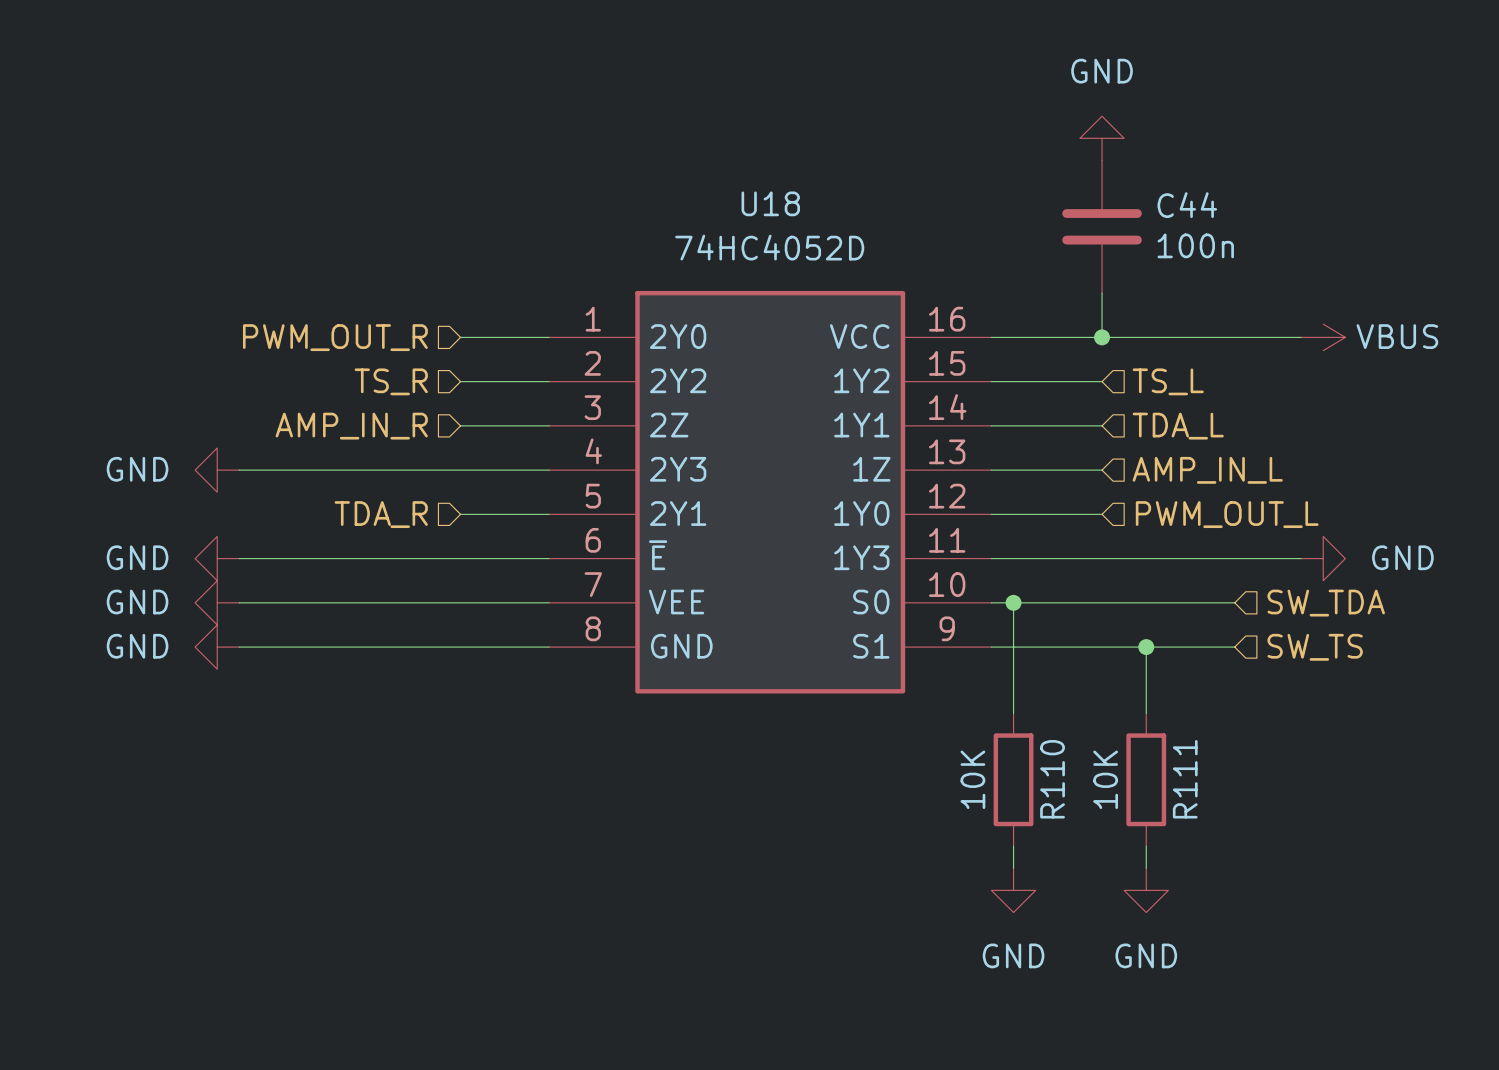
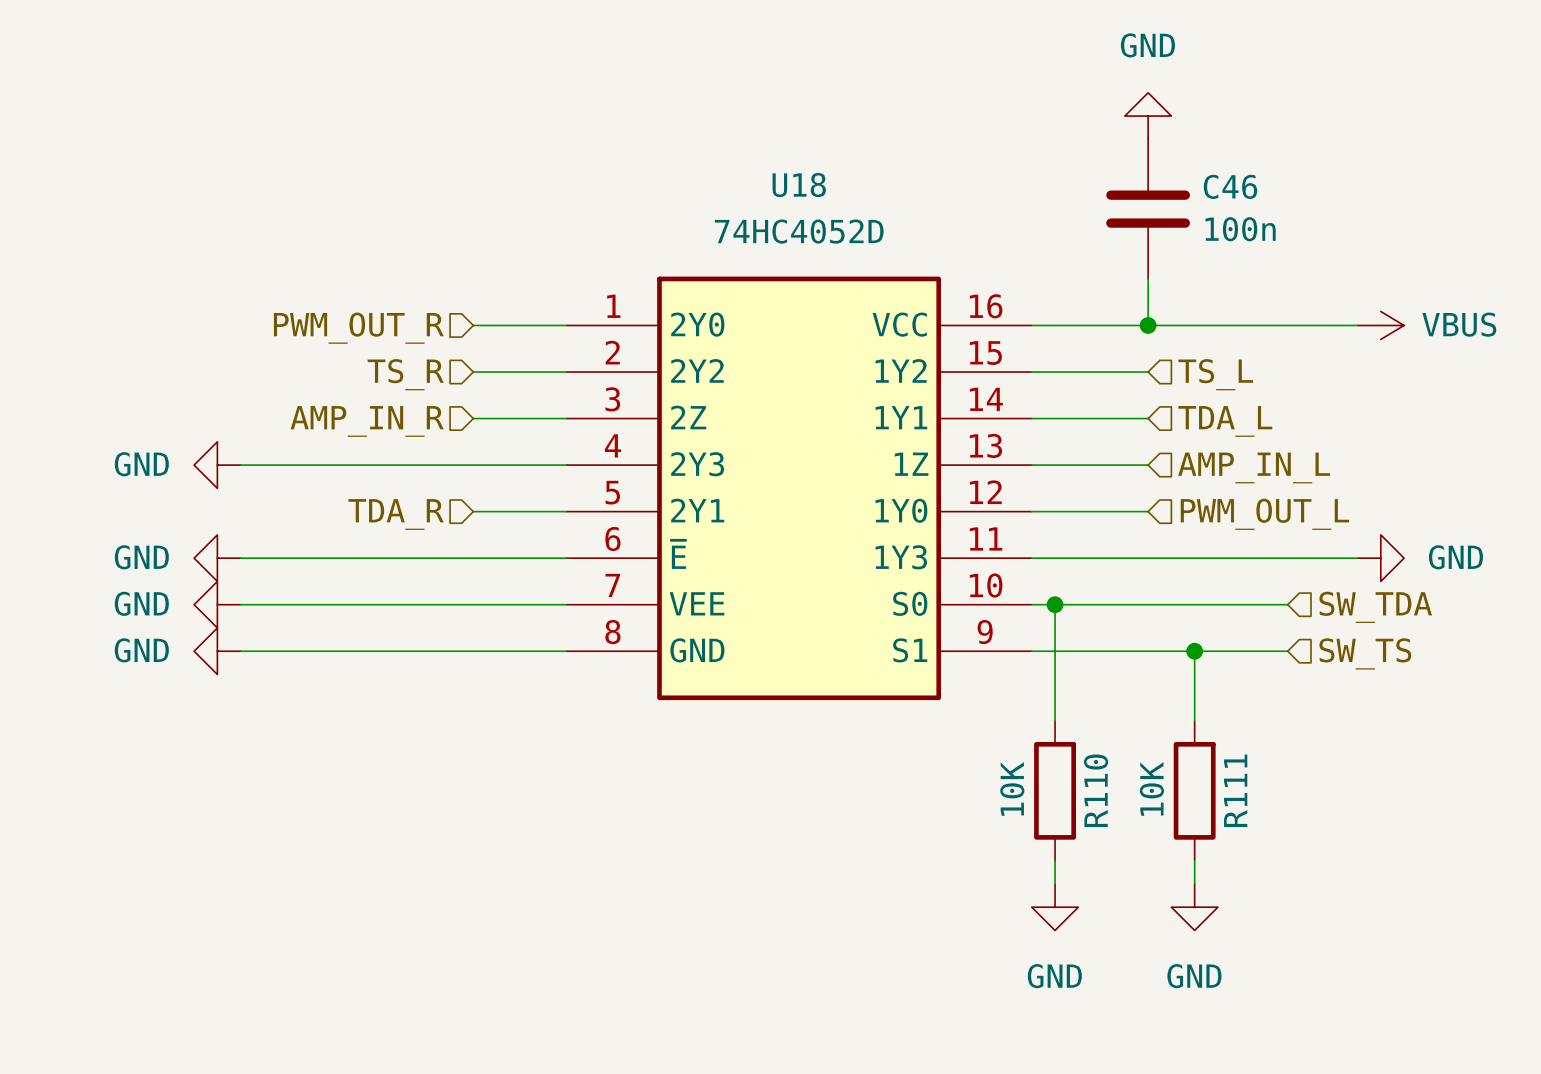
C44 name: C44 (1187, 205) -> C46 (1230, 186)

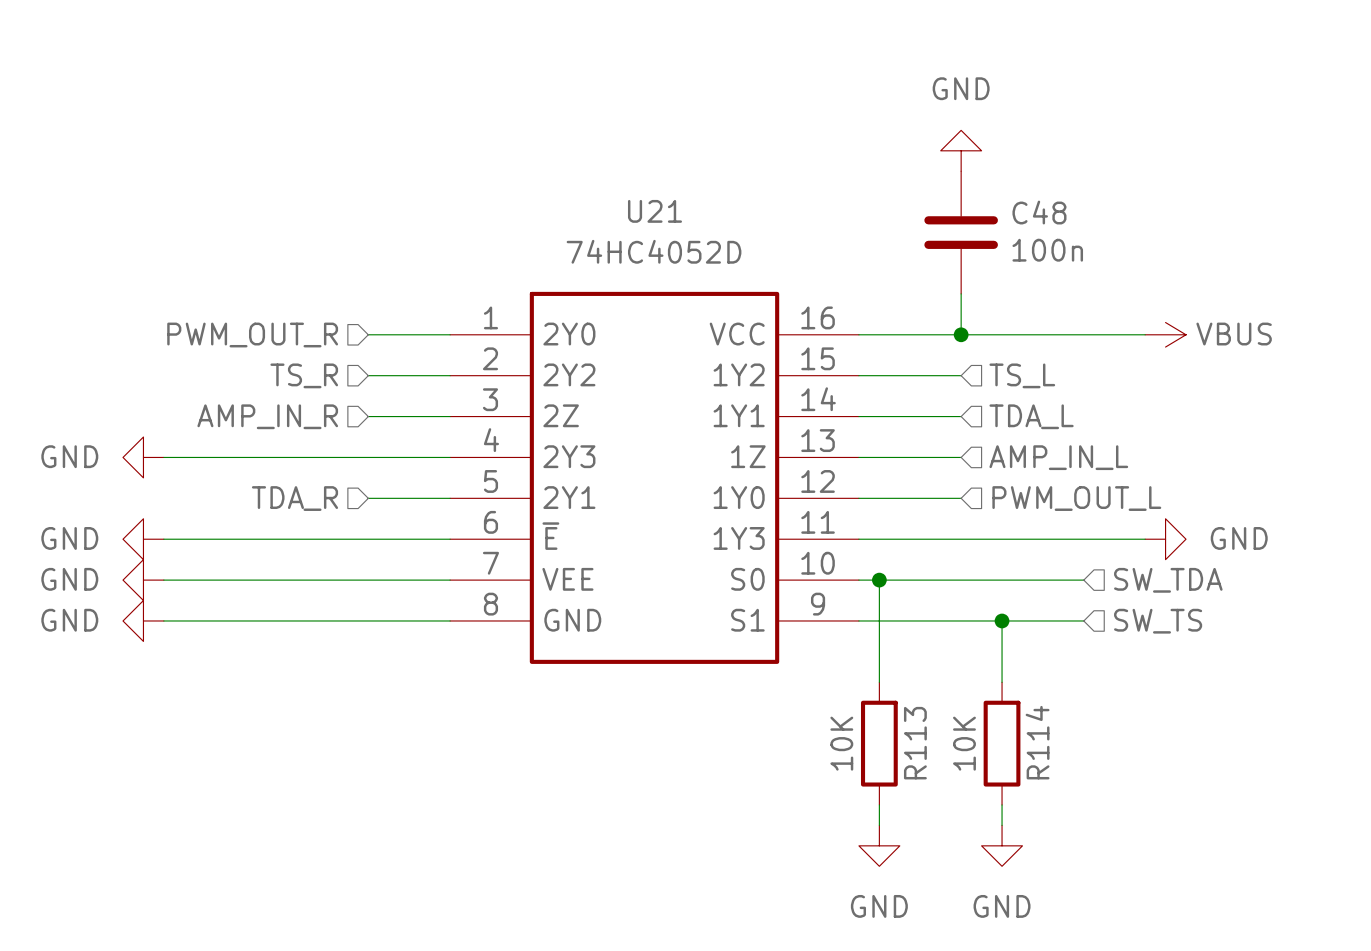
U18 name: U18 (799, 185) -> U21 (654, 211)
C46 name: C46 (1230, 186) -> C48 (1039, 212)
R110 name: R110 (1096, 790) -> R113 (915, 743)
R111 name: R111 (1235, 790) -> R114 (1037, 742)

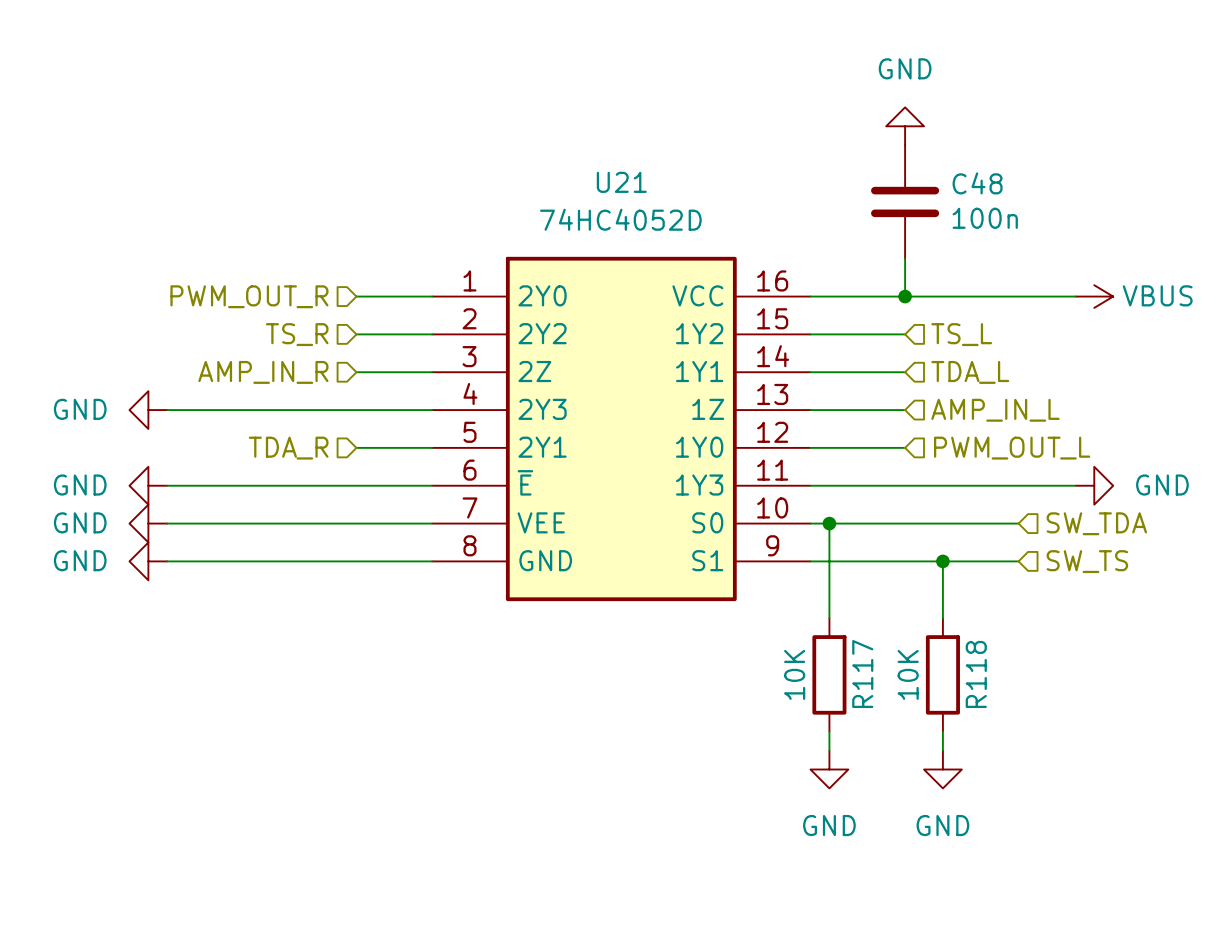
R114 name: R114 (1037, 742) -> R118 (976, 674)
R113 name: R113 (915, 743) -> R117 (862, 674)

